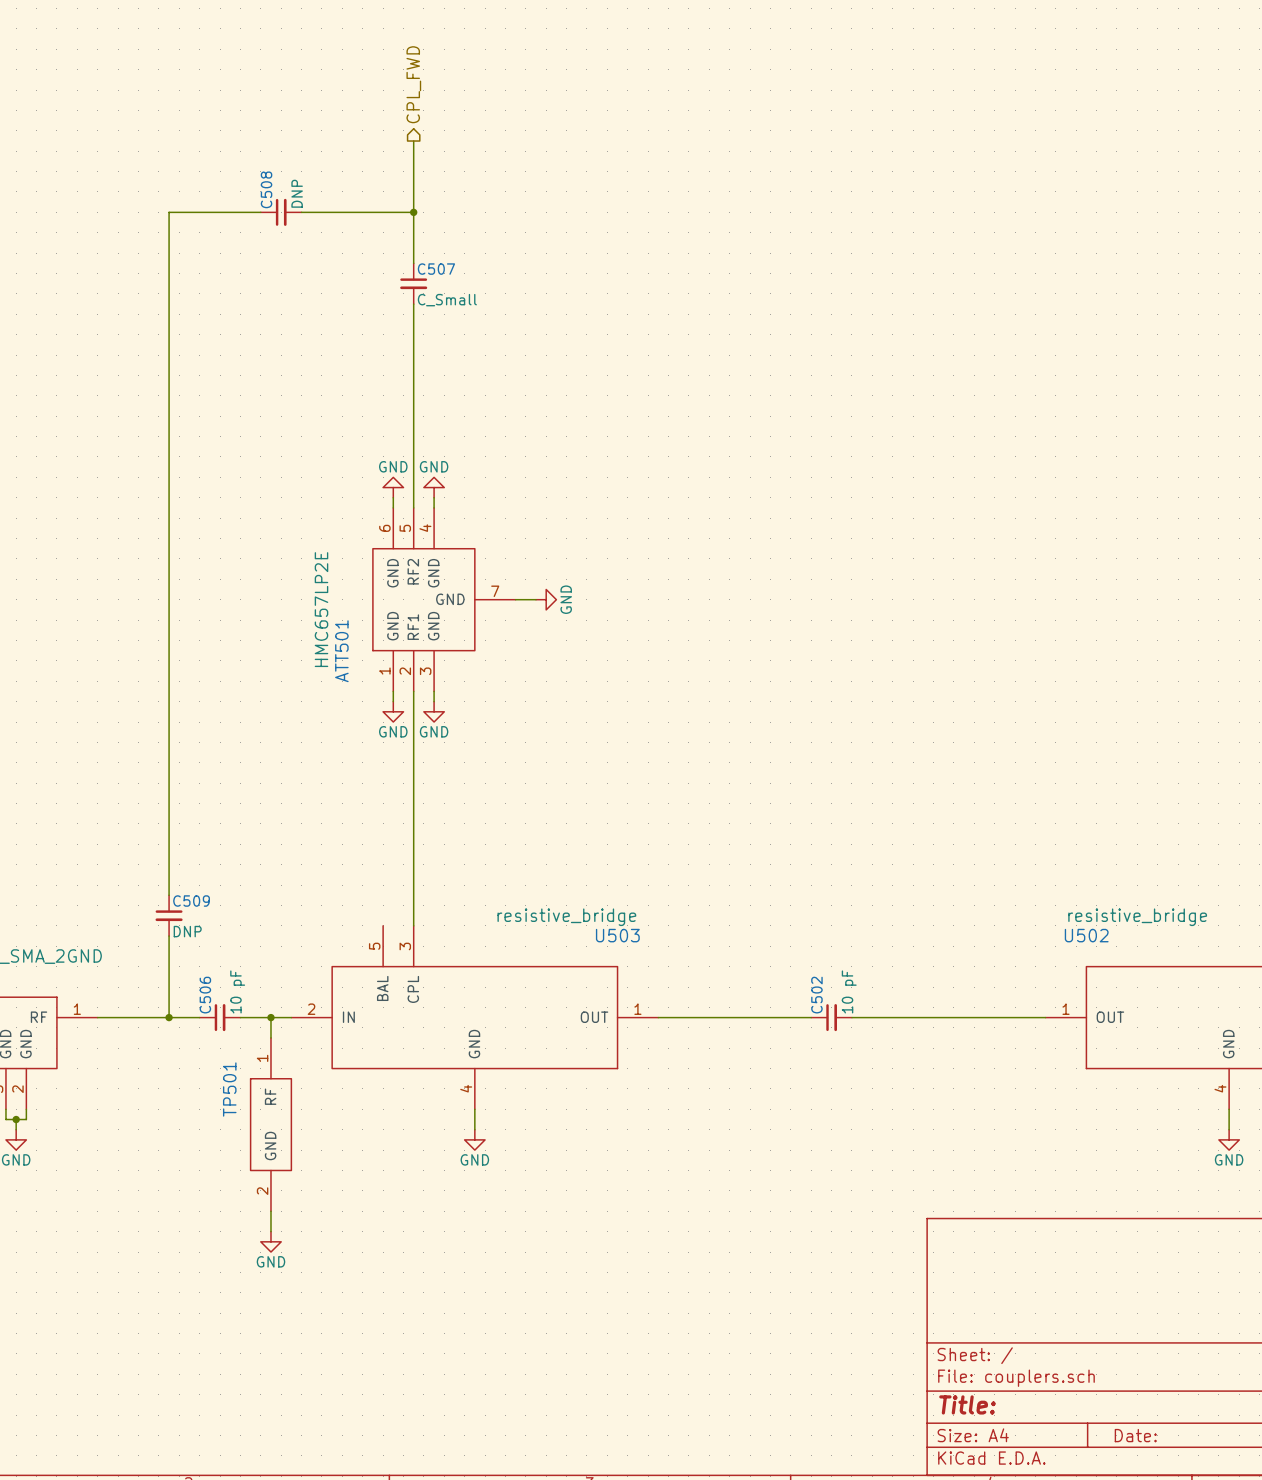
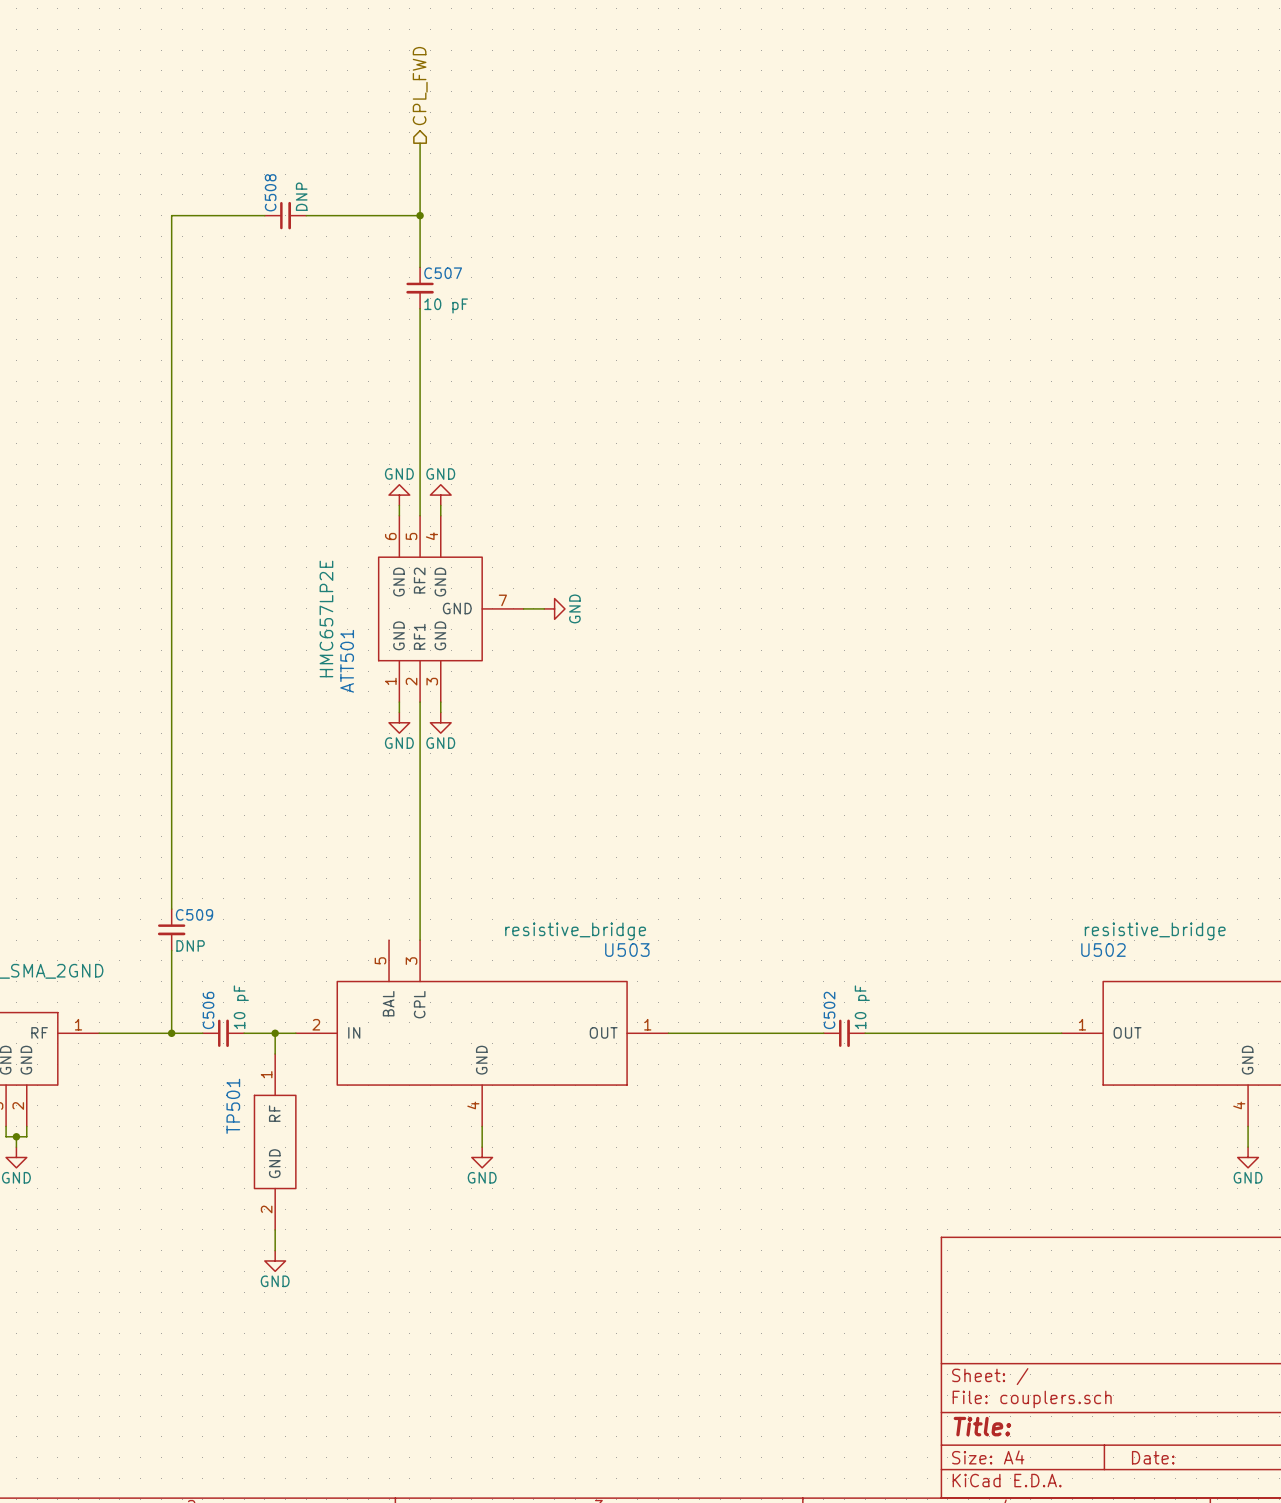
C507 value: C_Small (447, 300) -> 10 pF (446, 305)

